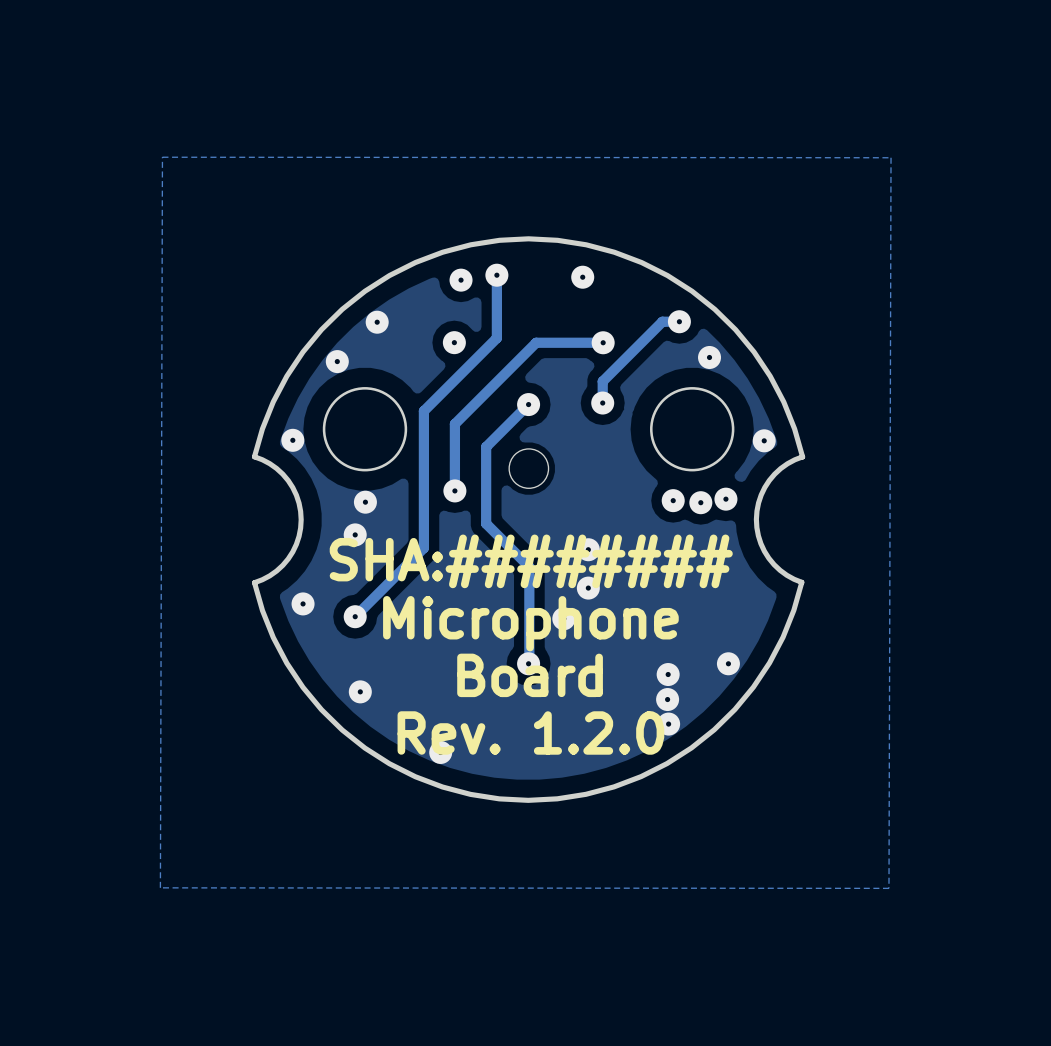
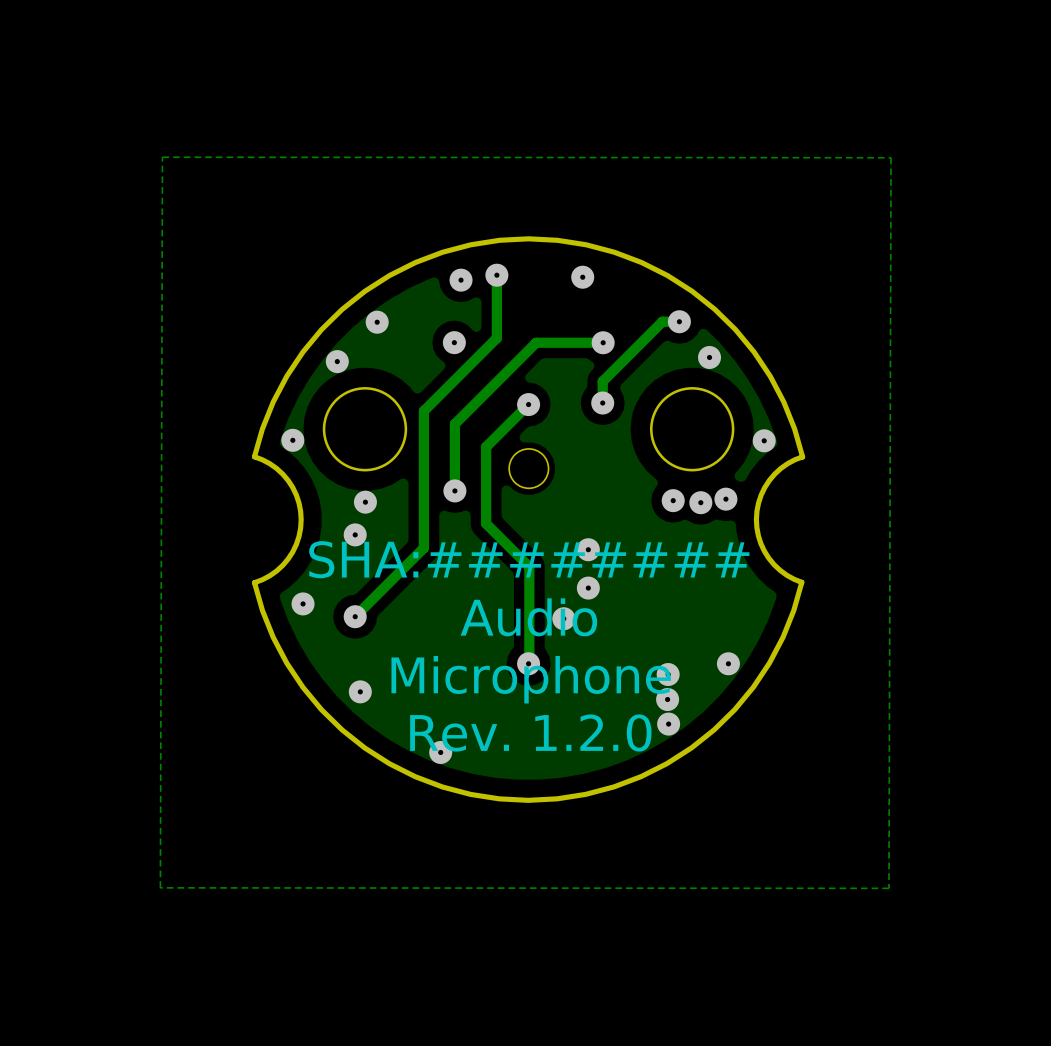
text: Microphone (530, 623) -> Audio (528, 617)
text: Board (530, 675) -> Microphone (531, 679)

